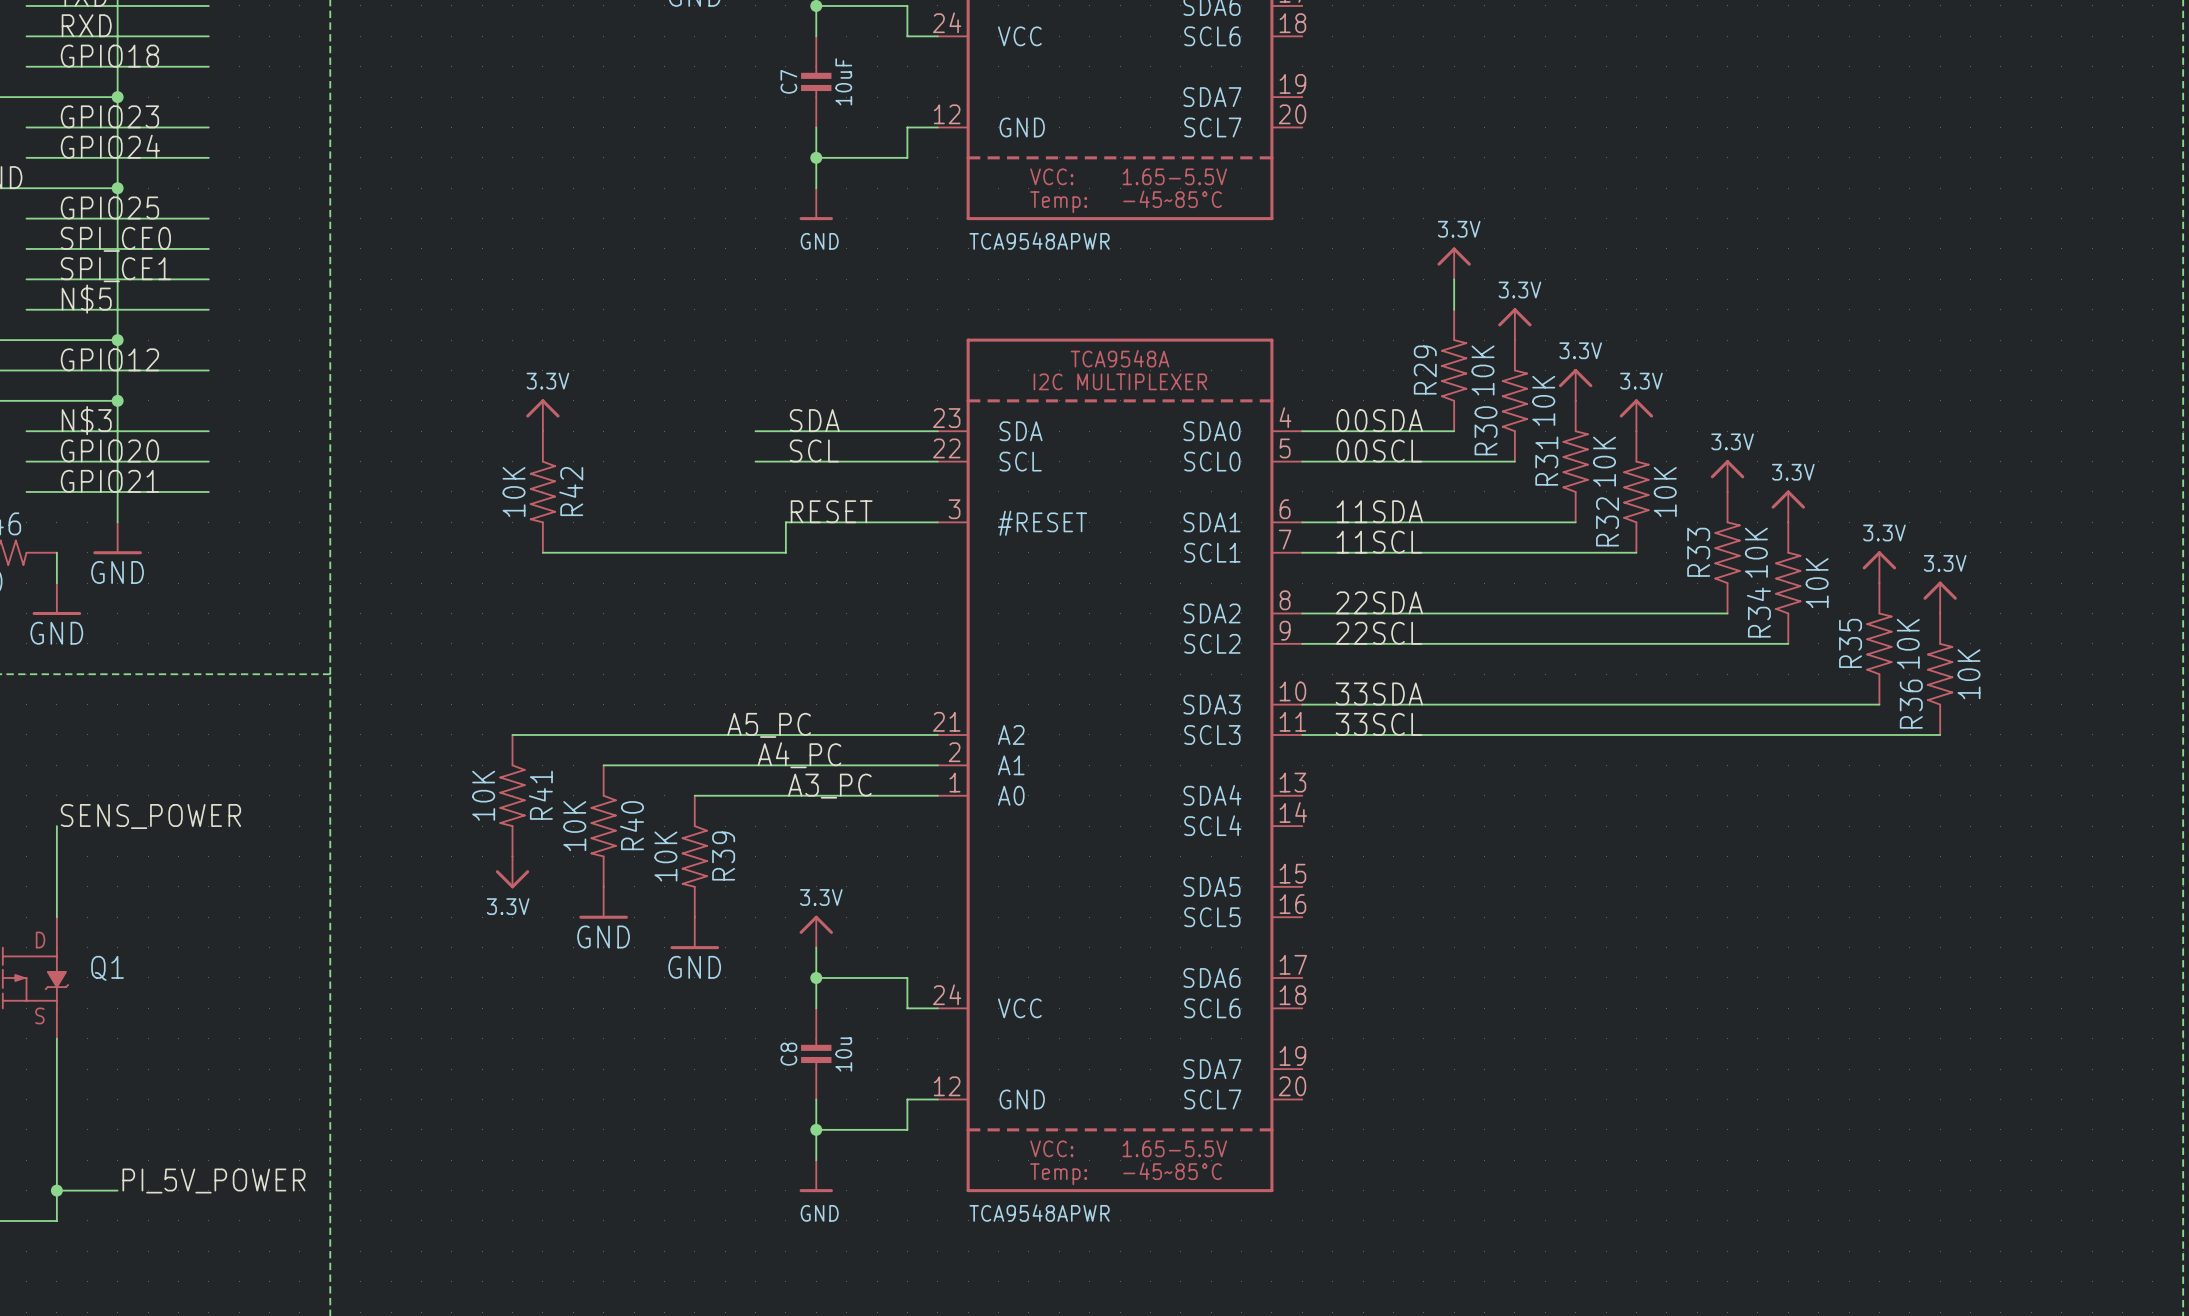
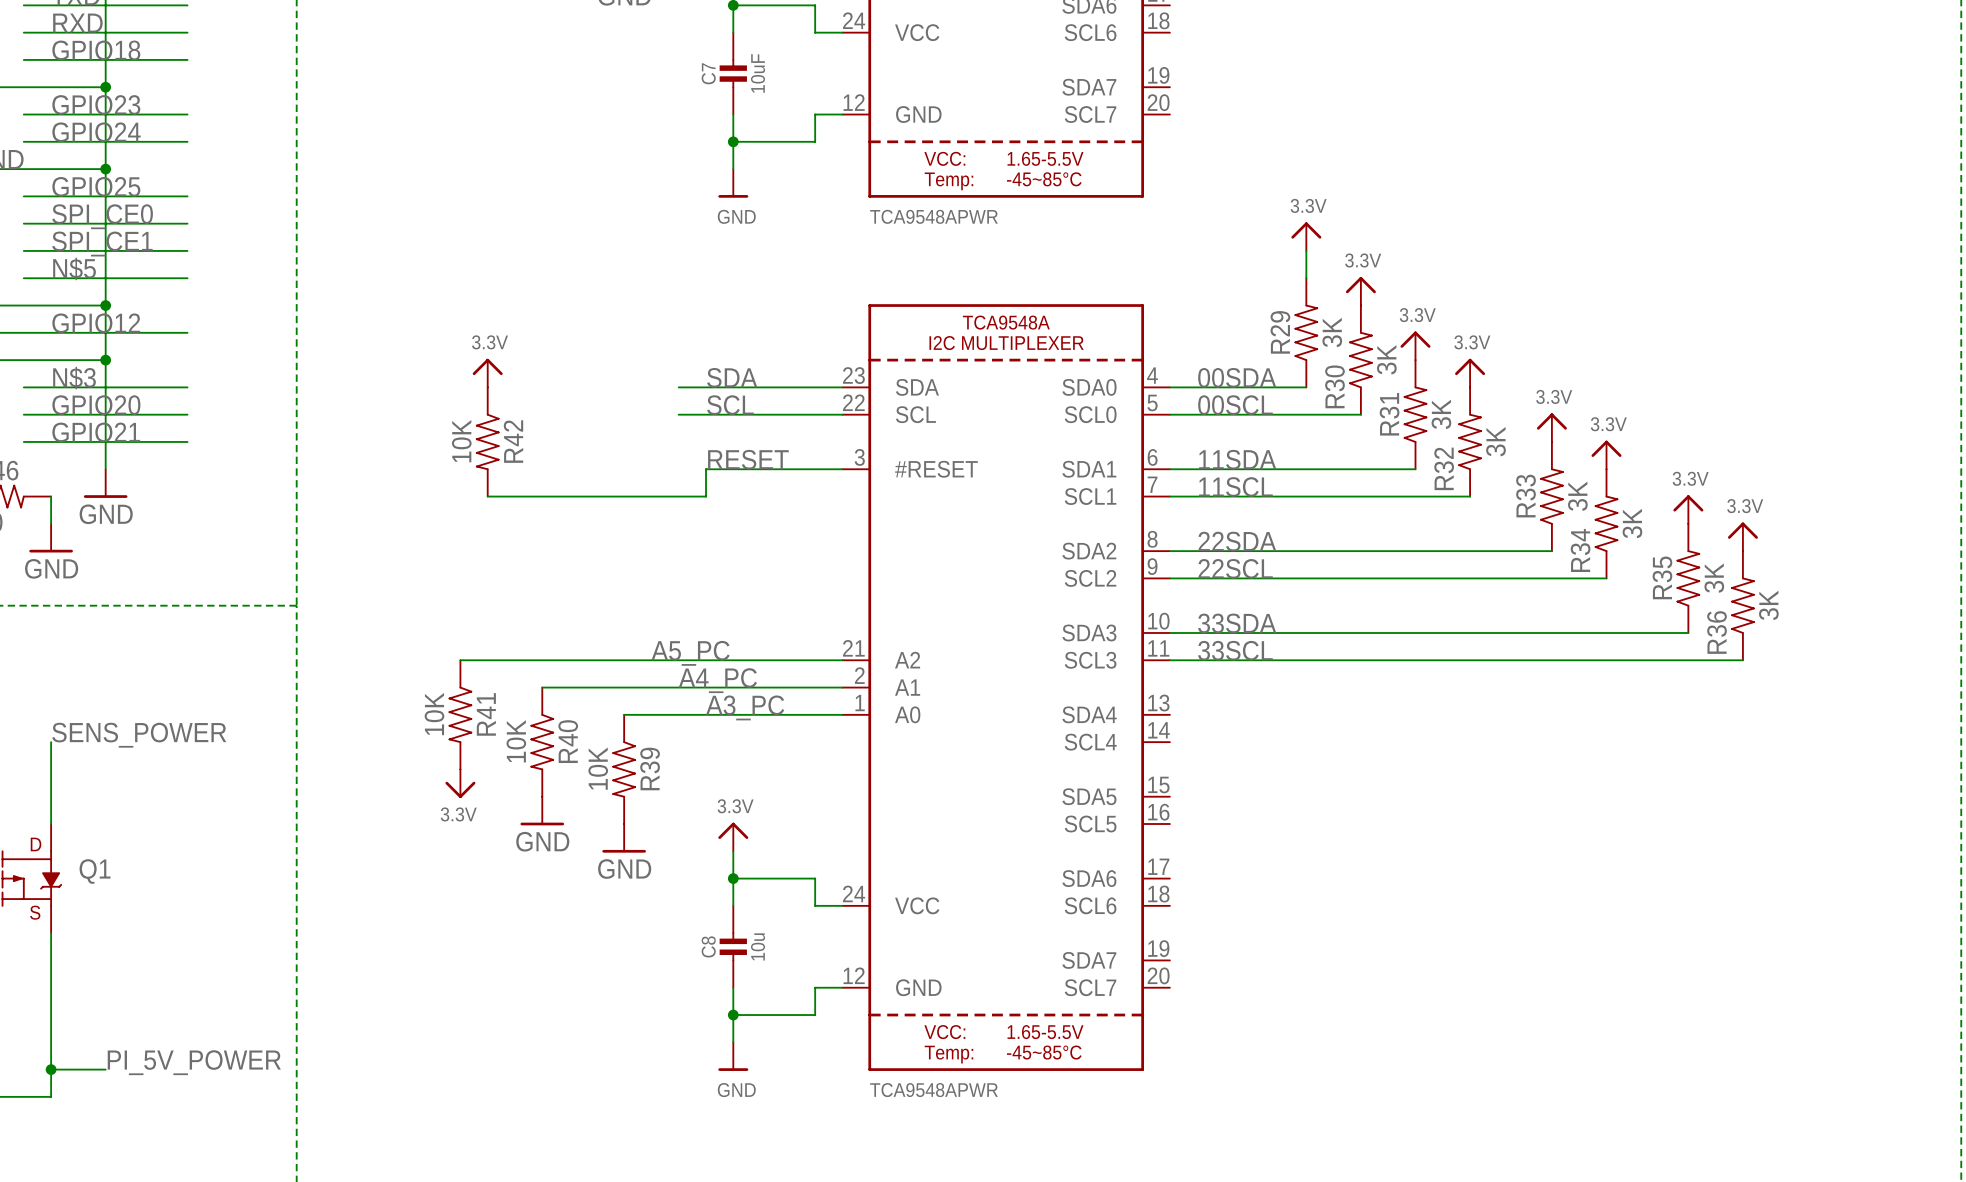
R29 value: 10K (1483, 370) -> 3K (1332, 332)
R30 value: 10K (1543, 400) -> 3K (1386, 359)
R31 value: 10K (1604, 461) -> 3K (1441, 414)
R32 value: 10K (1665, 491) -> 3K (1495, 441)
R33 value: 10K (1756, 552) -> 3K (1577, 496)
R34 value: 10K (1817, 583) -> 3K (1632, 523)
R35 value: 10K (1908, 643) -> 3K (1714, 578)
R36 value: 10K (1969, 674) -> 3K (1768, 605)

